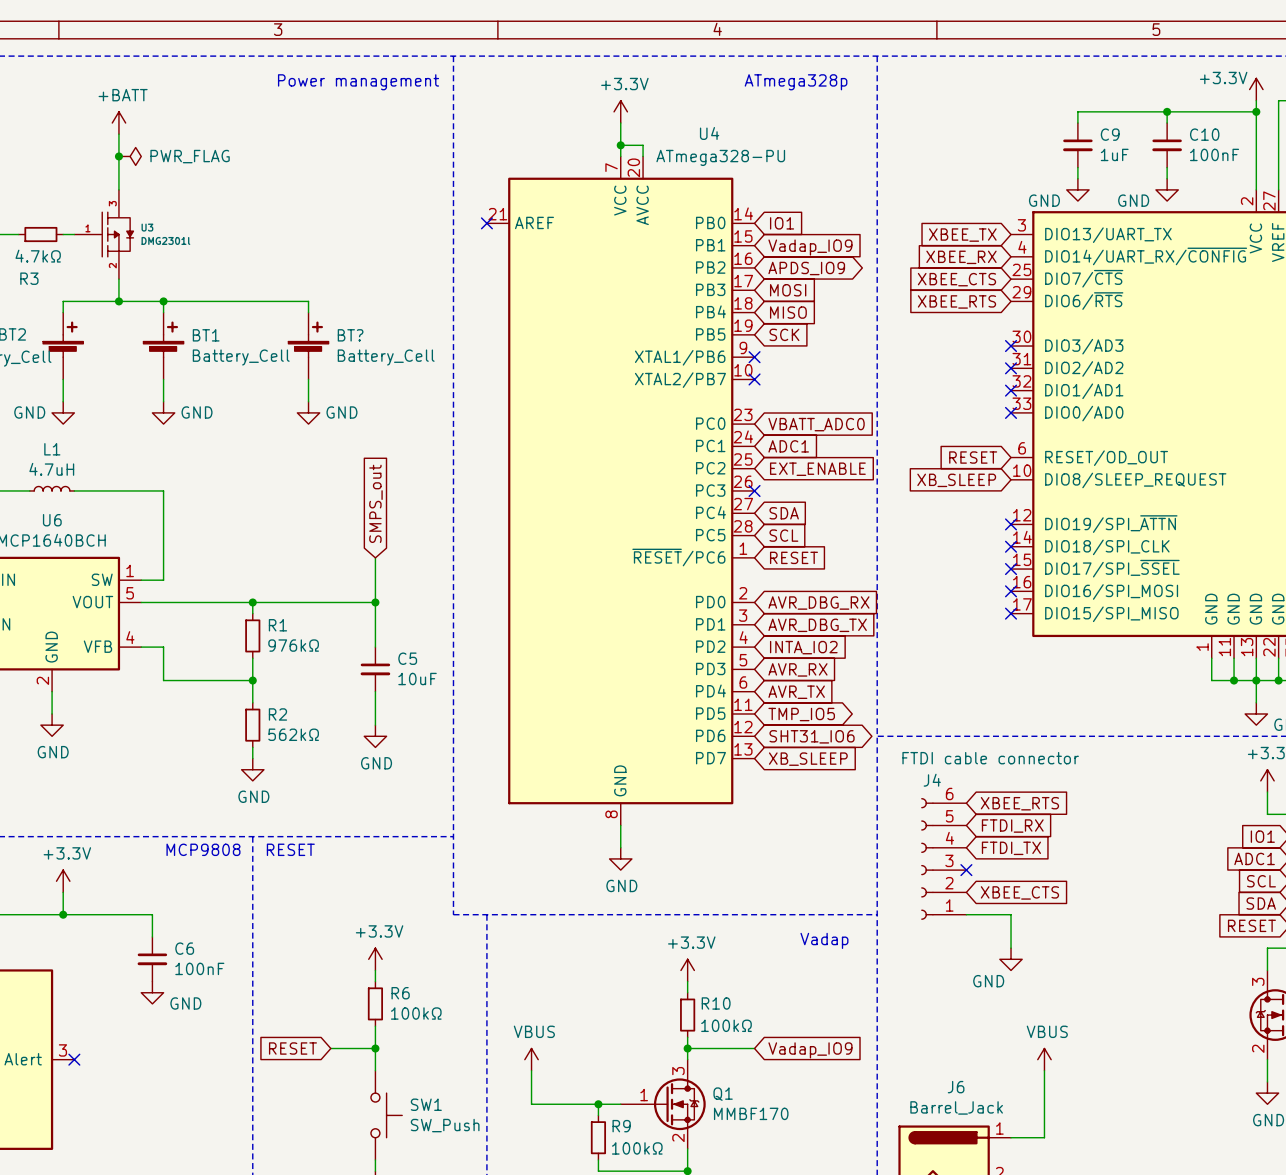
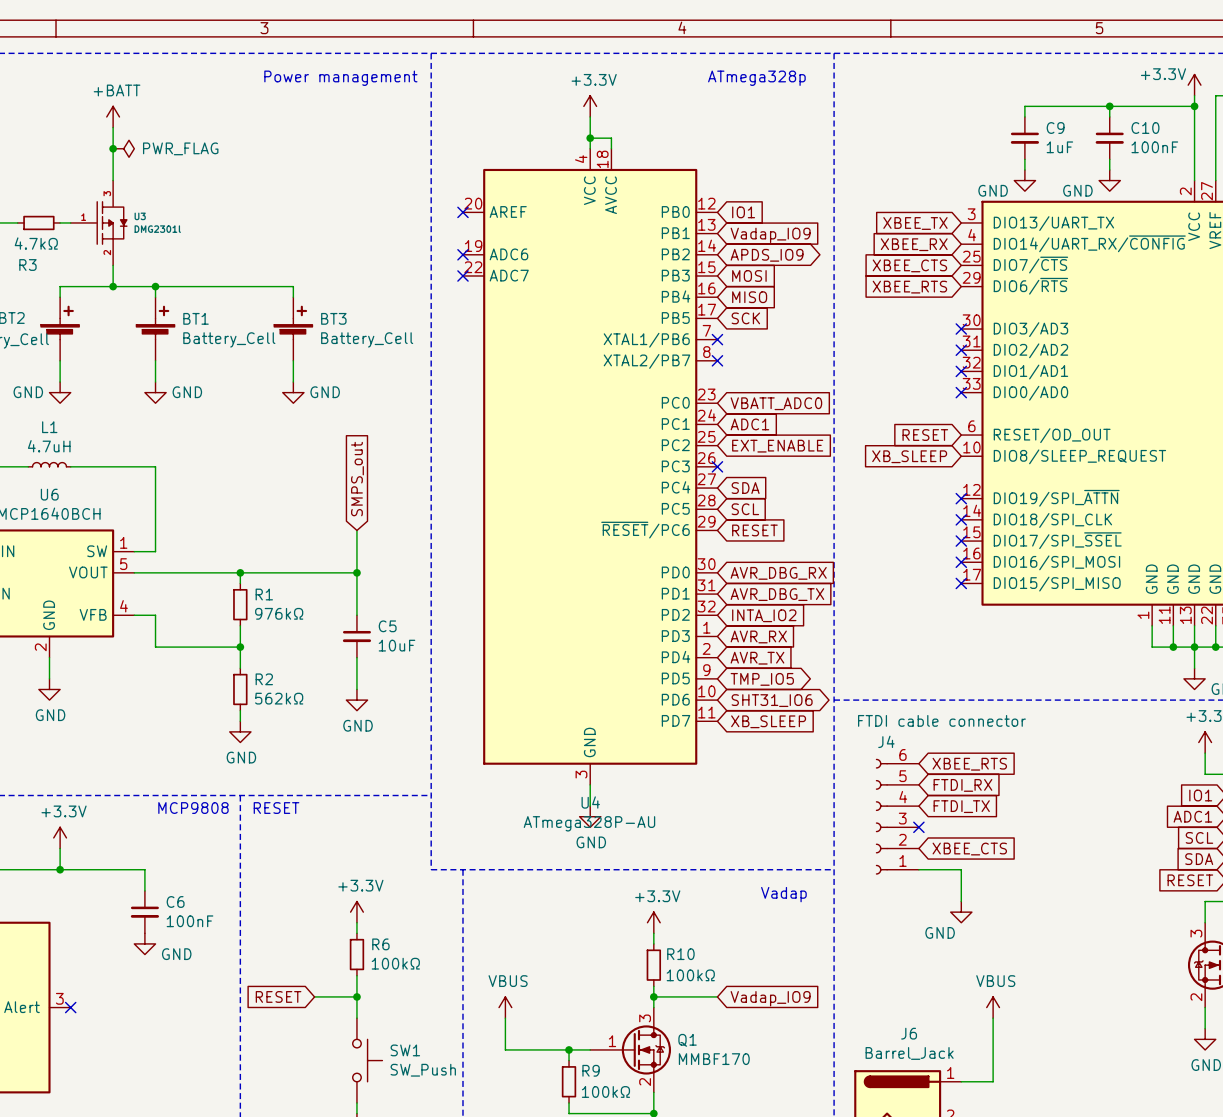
U4 name position: U4 (709, 133) -> U4 (590, 802)
U4 symbol: [486, 156, 755, 826] -> [462, 148, 718, 785]
U4 value: ATmega328-PU (720, 157) -> ATmega328P-AU (589, 823)
no-connect mark: none -> (462, 254)
no-connect mark: none -> (462, 275)
BT? name: BT? (350, 335) -> BT3 (333, 318)

